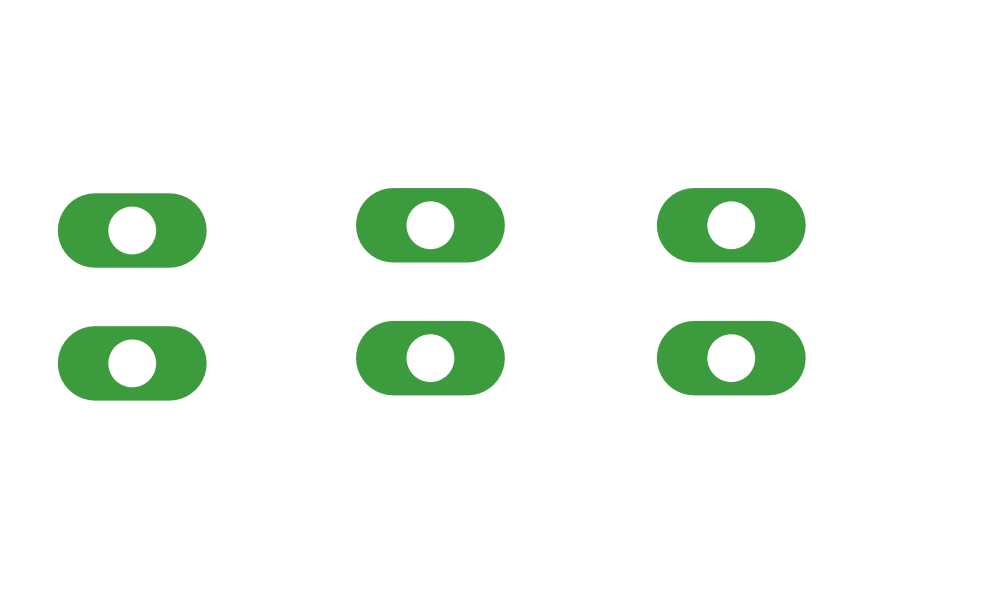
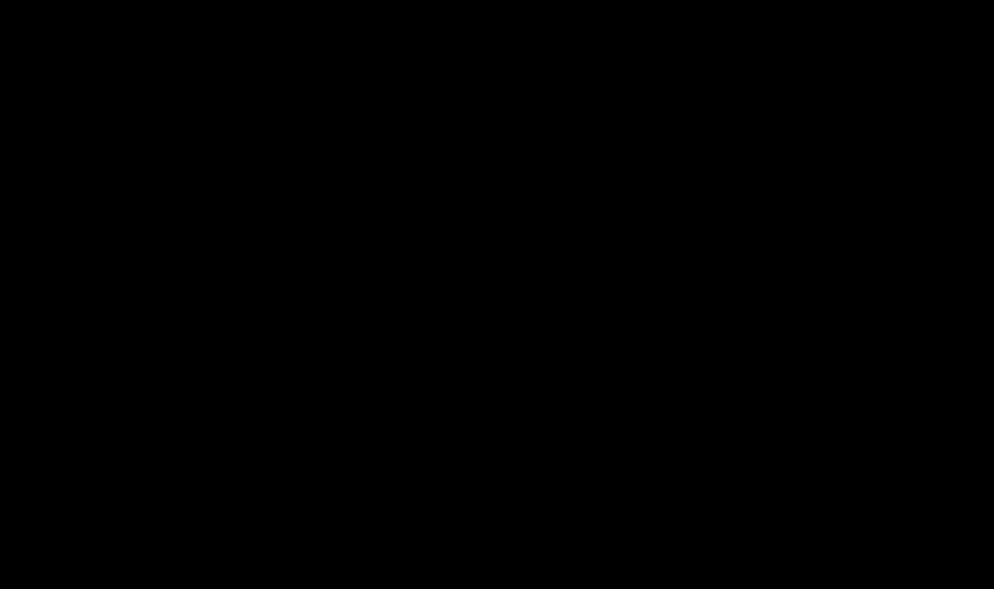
part: (430, 291) -> none
part: (731, 291) -> none
part: (132, 296) -> none

